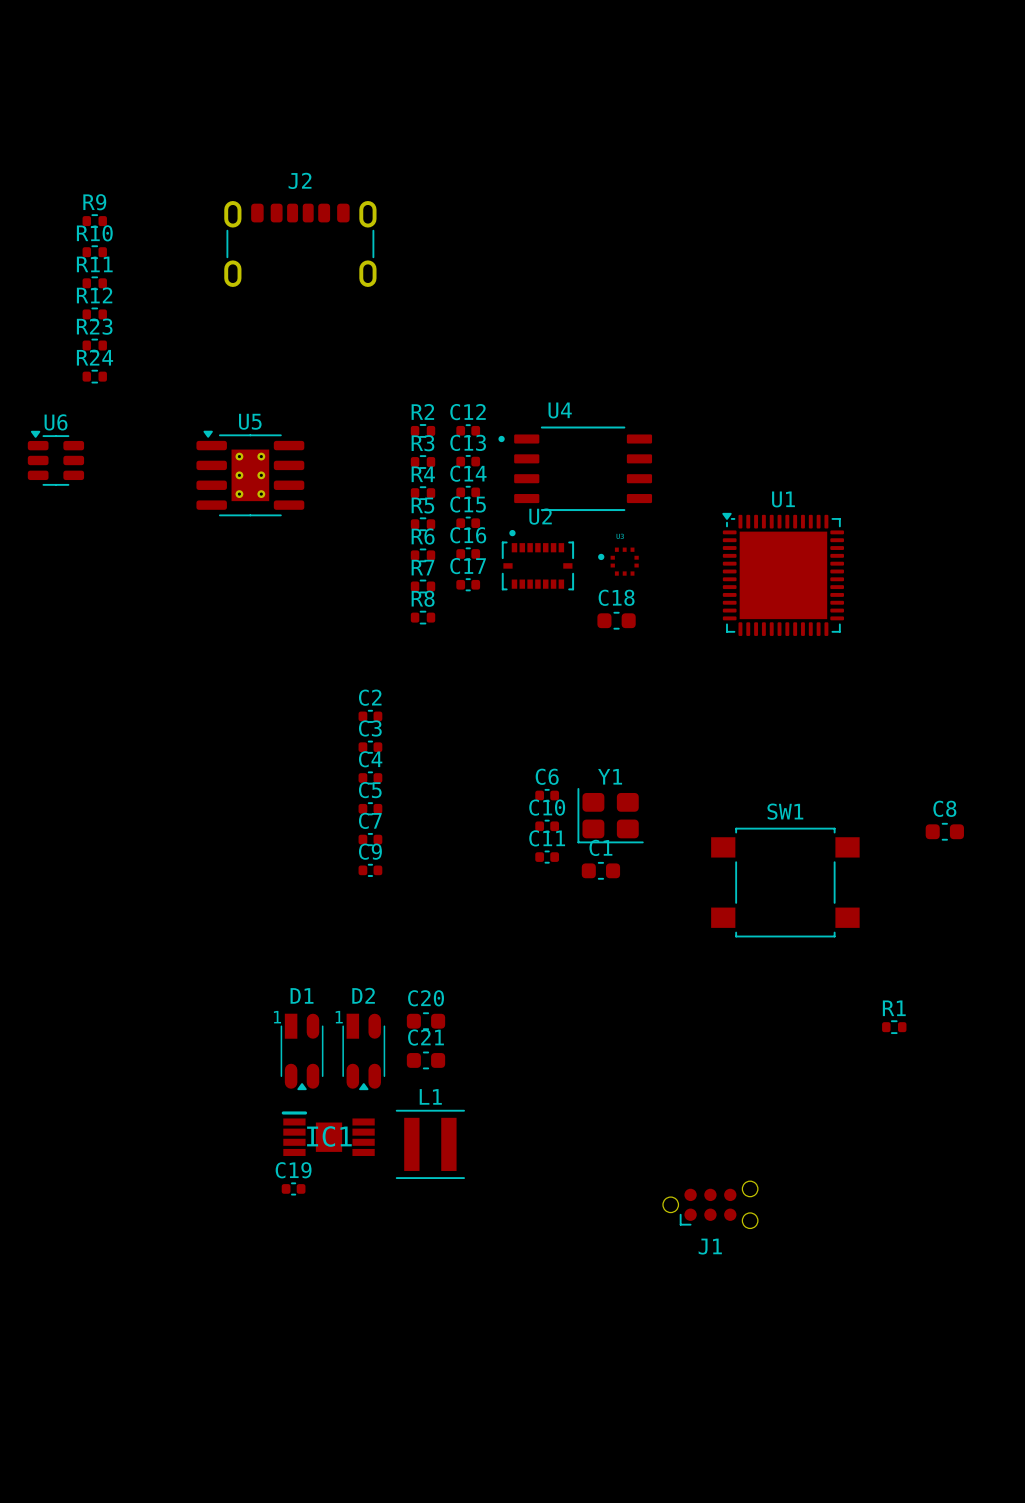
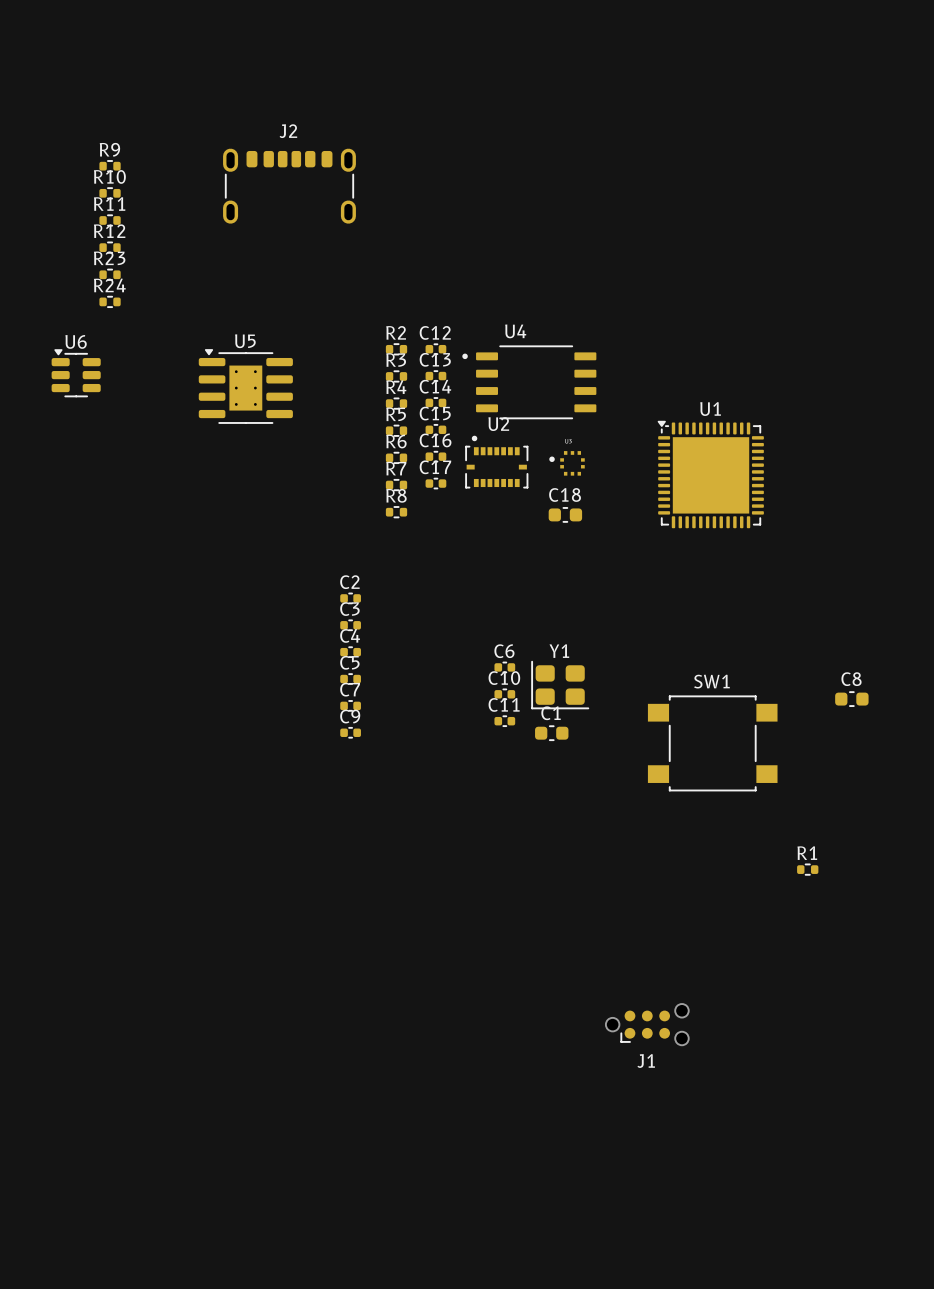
C20: (426, 1021) -> none
D1: (302, 1051) -> none
D2: (363, 1051) -> none
C21: (426, 1060) -> none
IC1: (328, 1133) -> none
L1: (430, 1144) -> none
C19: (293, 1188) -> none

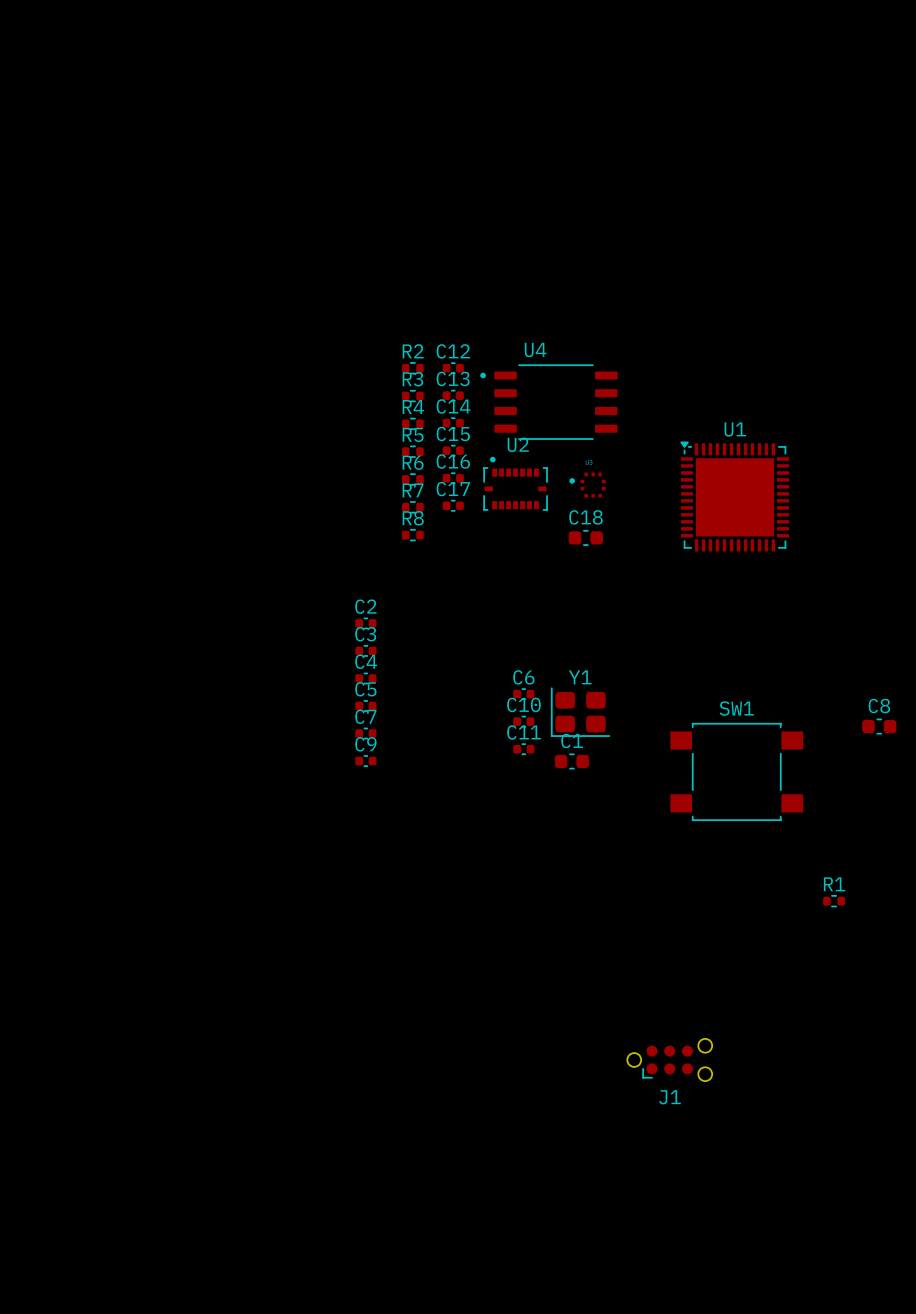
R9: (110, 166) -> none
J2: (289, 186) -> none
R10: (110, 193) -> none
R11: (110, 220) -> none
R12: (110, 247) -> none
R23: (110, 274) -> none
R24: (110, 301) -> none
U6: (76, 373) -> none
U5: (245, 386) -> none

